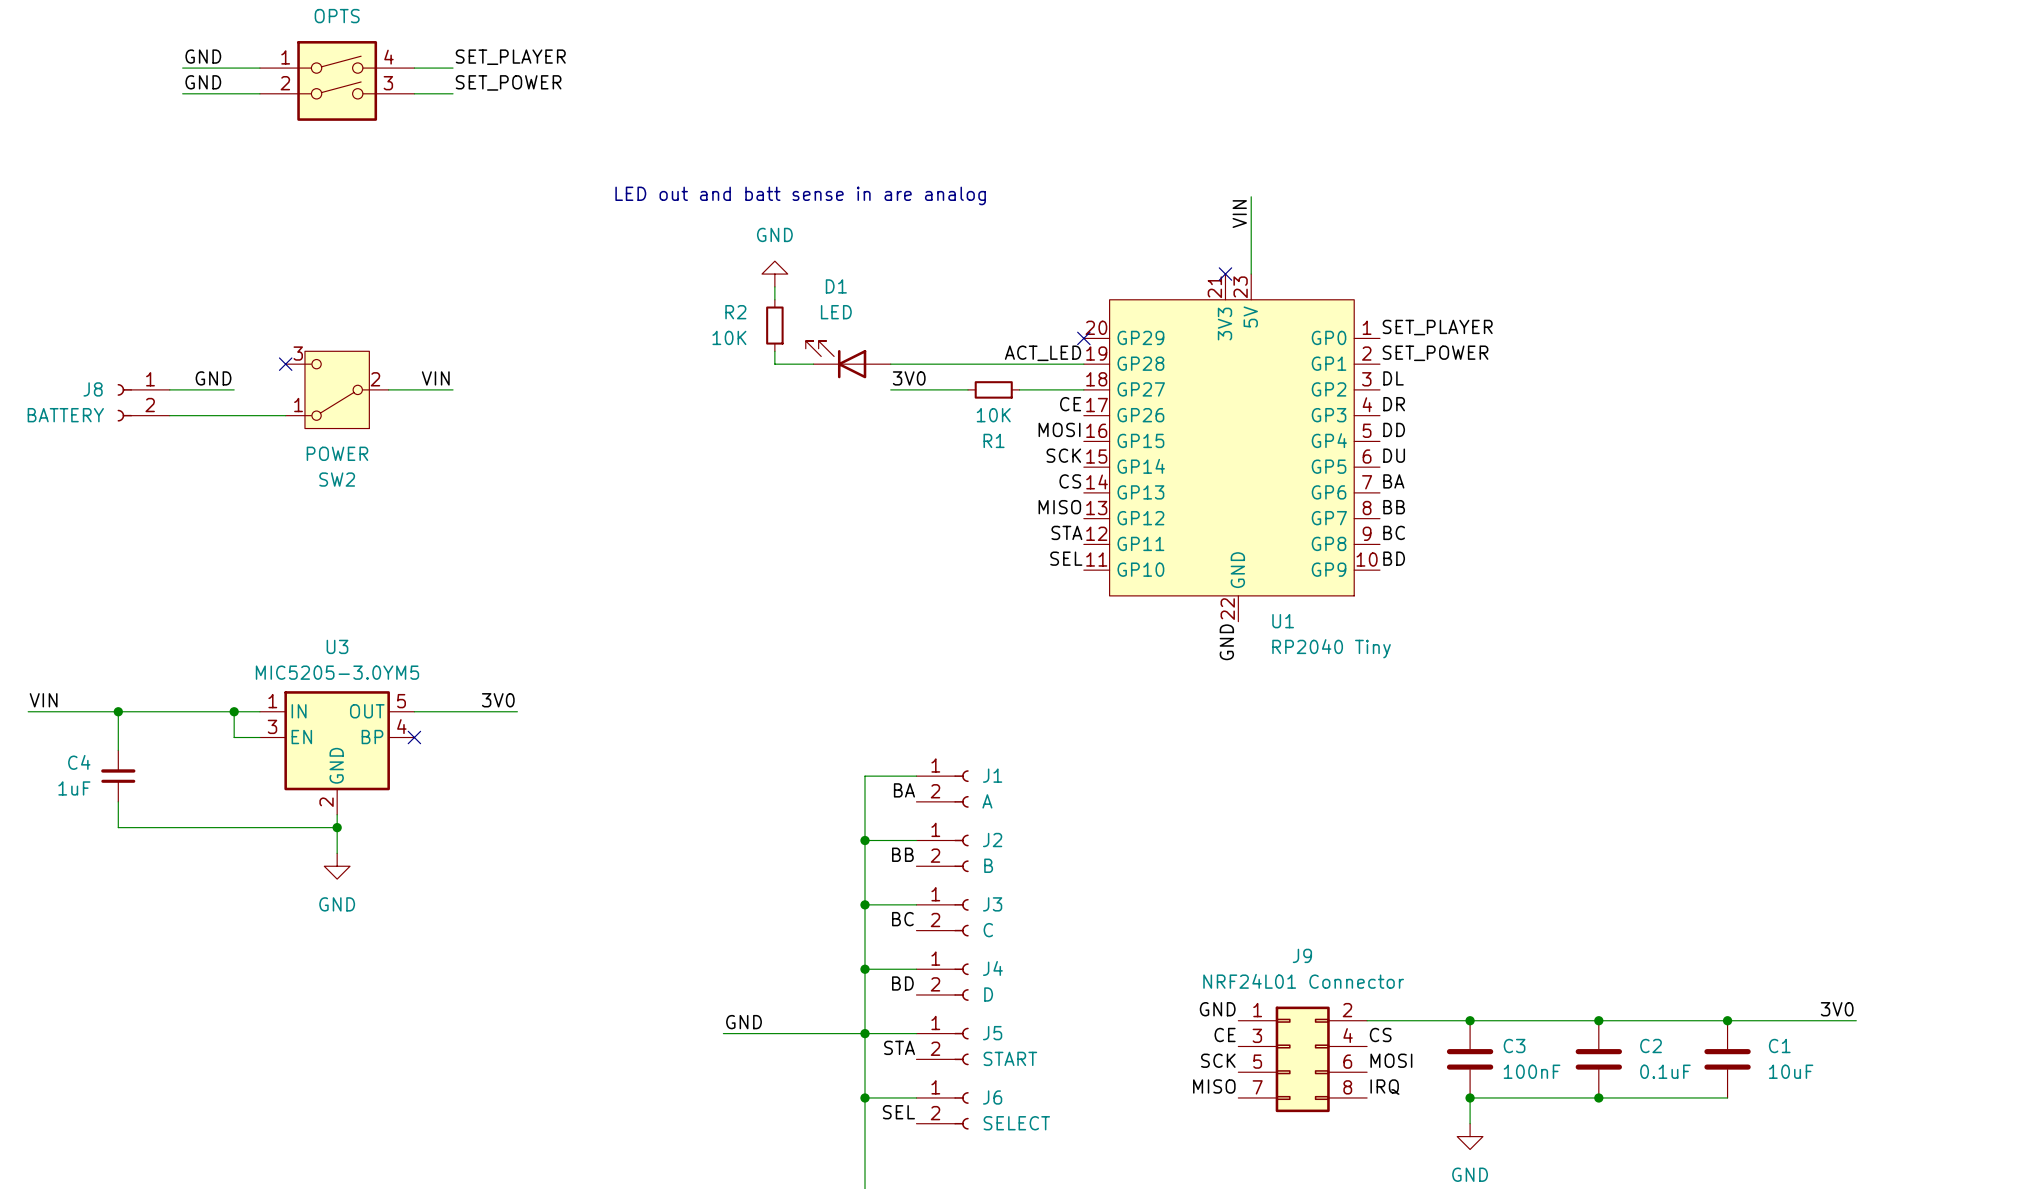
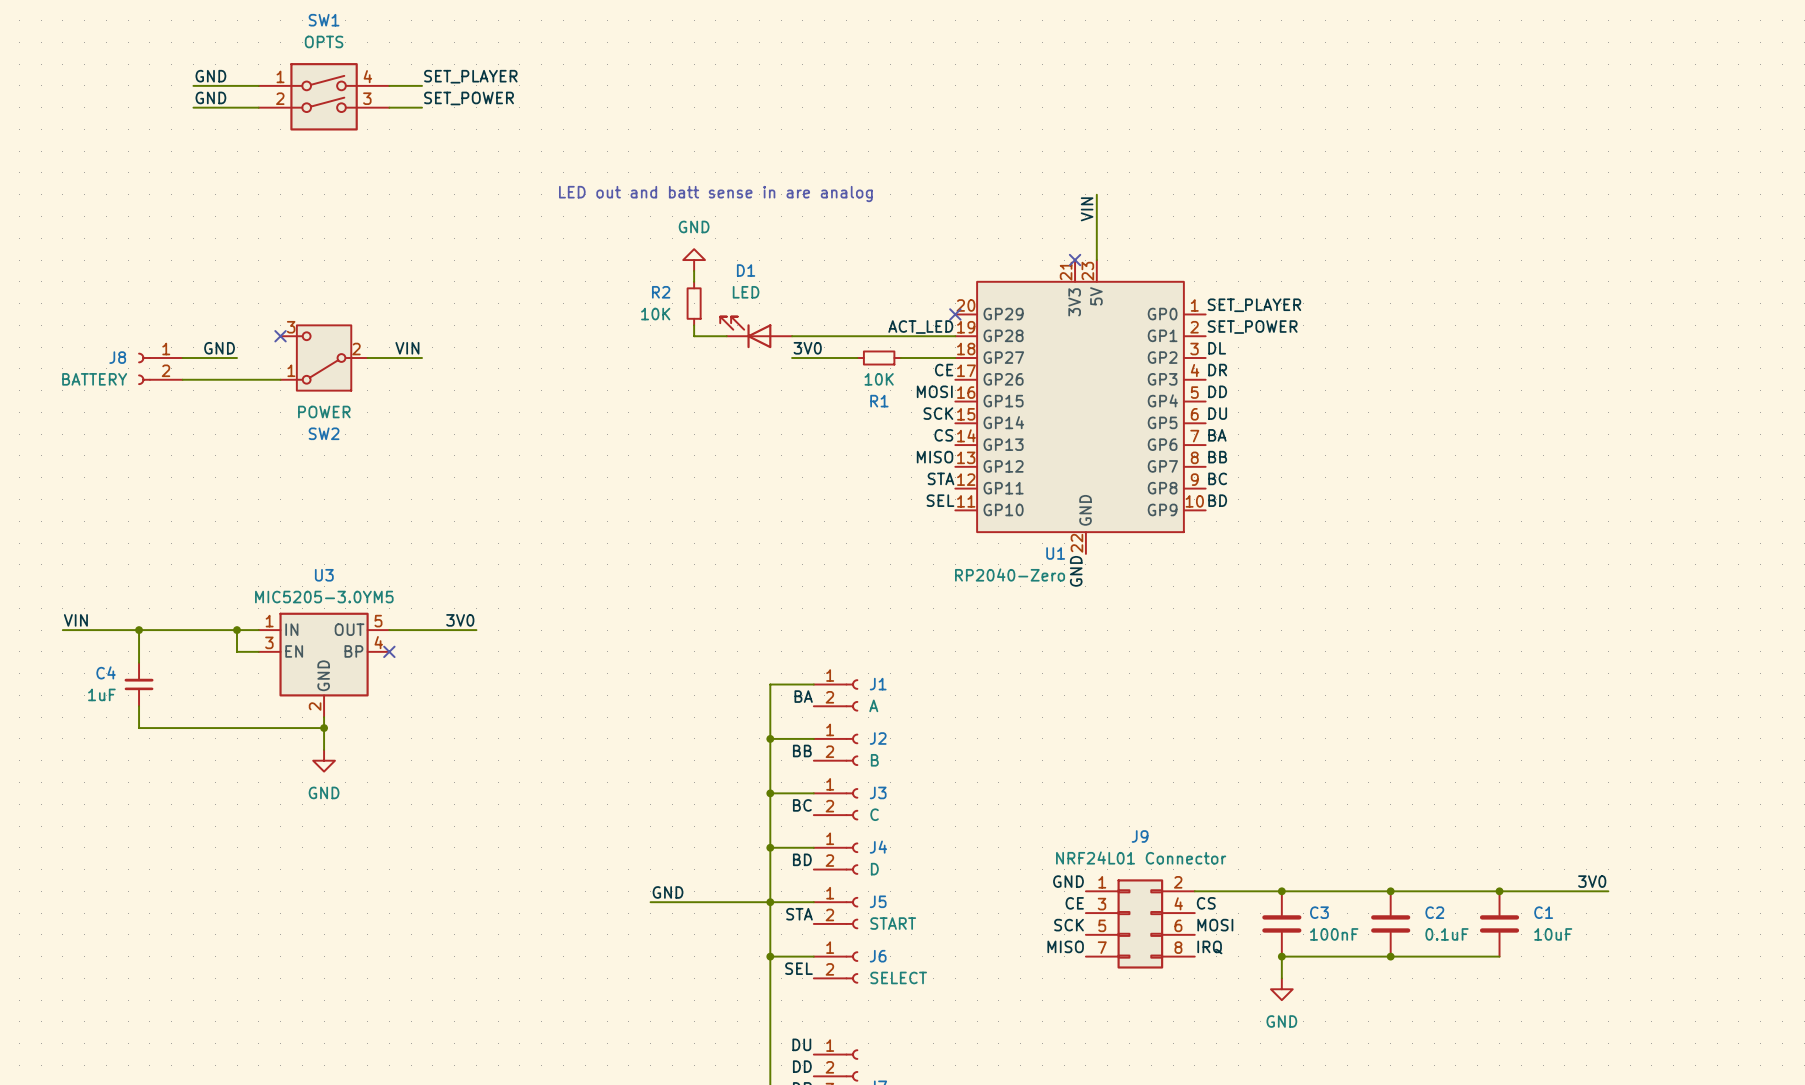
U1 name position: U1 (1283, 621) -> U1 (1055, 553)
U1 value: RP2040 Tiny (1331, 648) -> RP2040-Zero (1010, 575)

